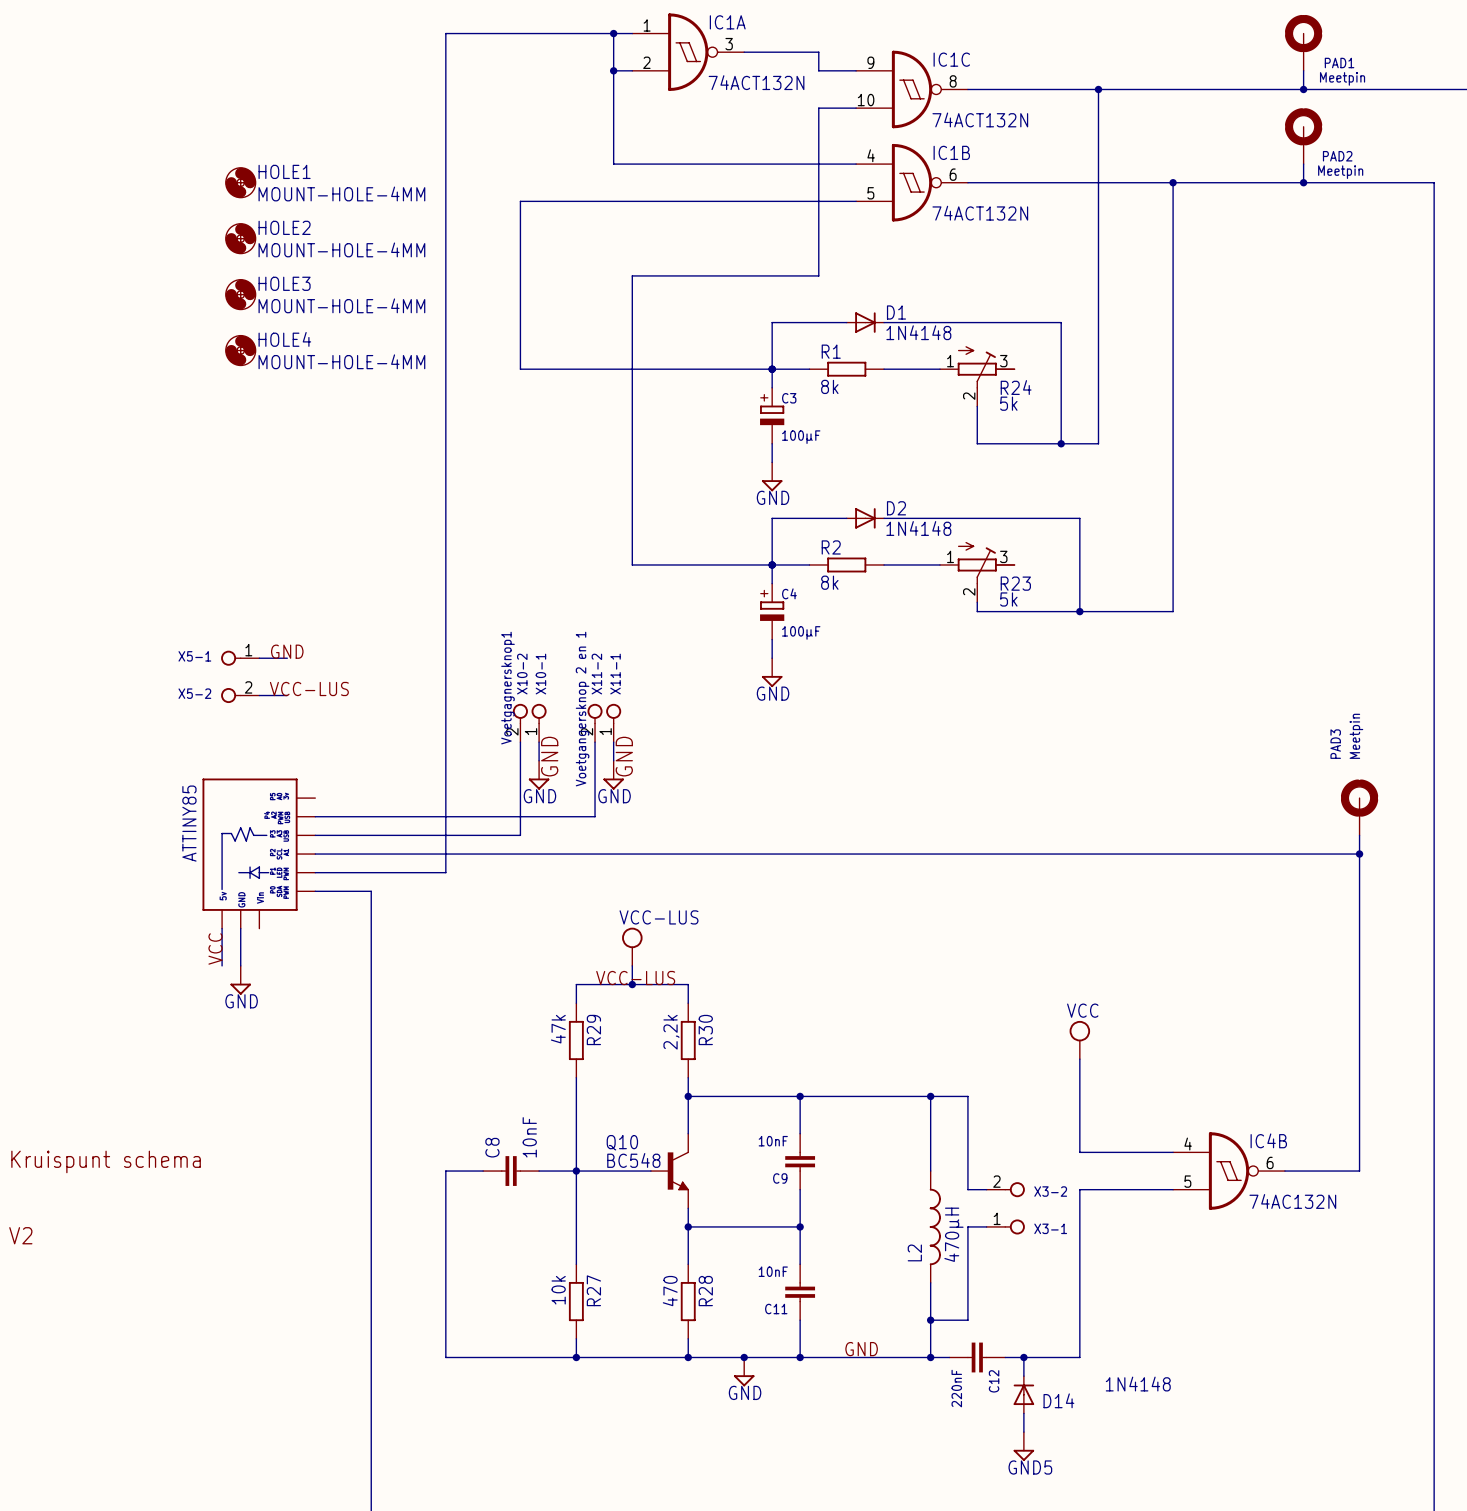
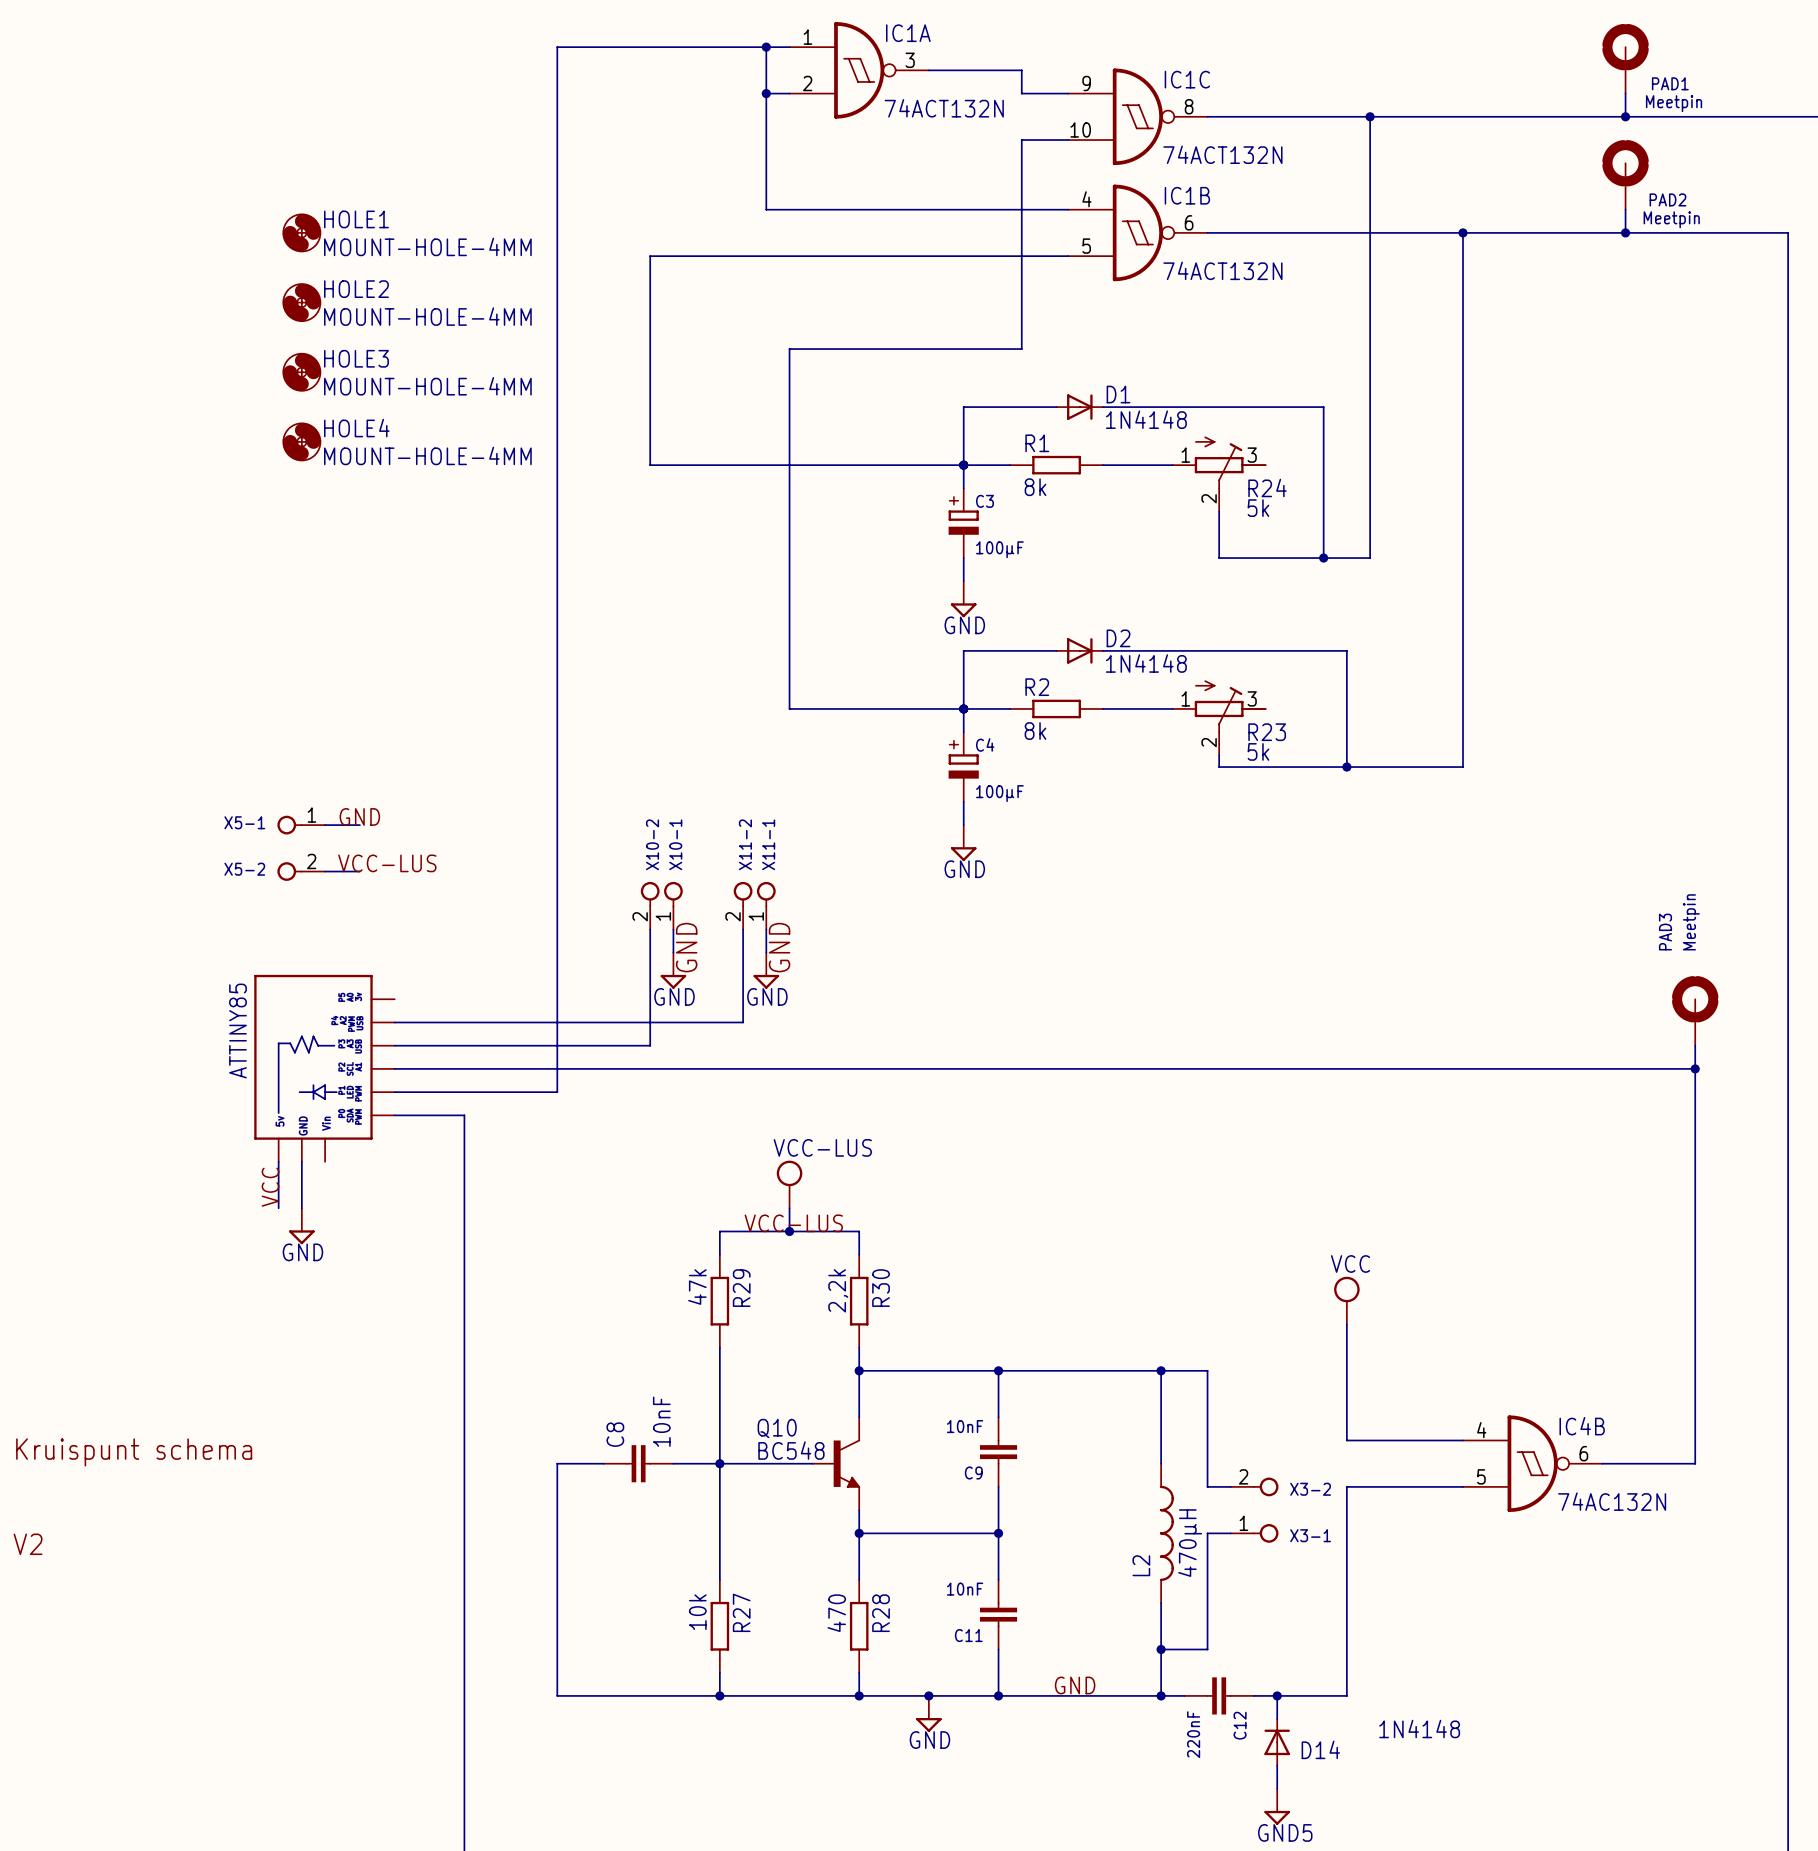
X10-2 value: Voetgagnersknop1 (507, 688) -> none
X11-2 value: Voetgangersknop 2 en 1 (582, 709) -> none

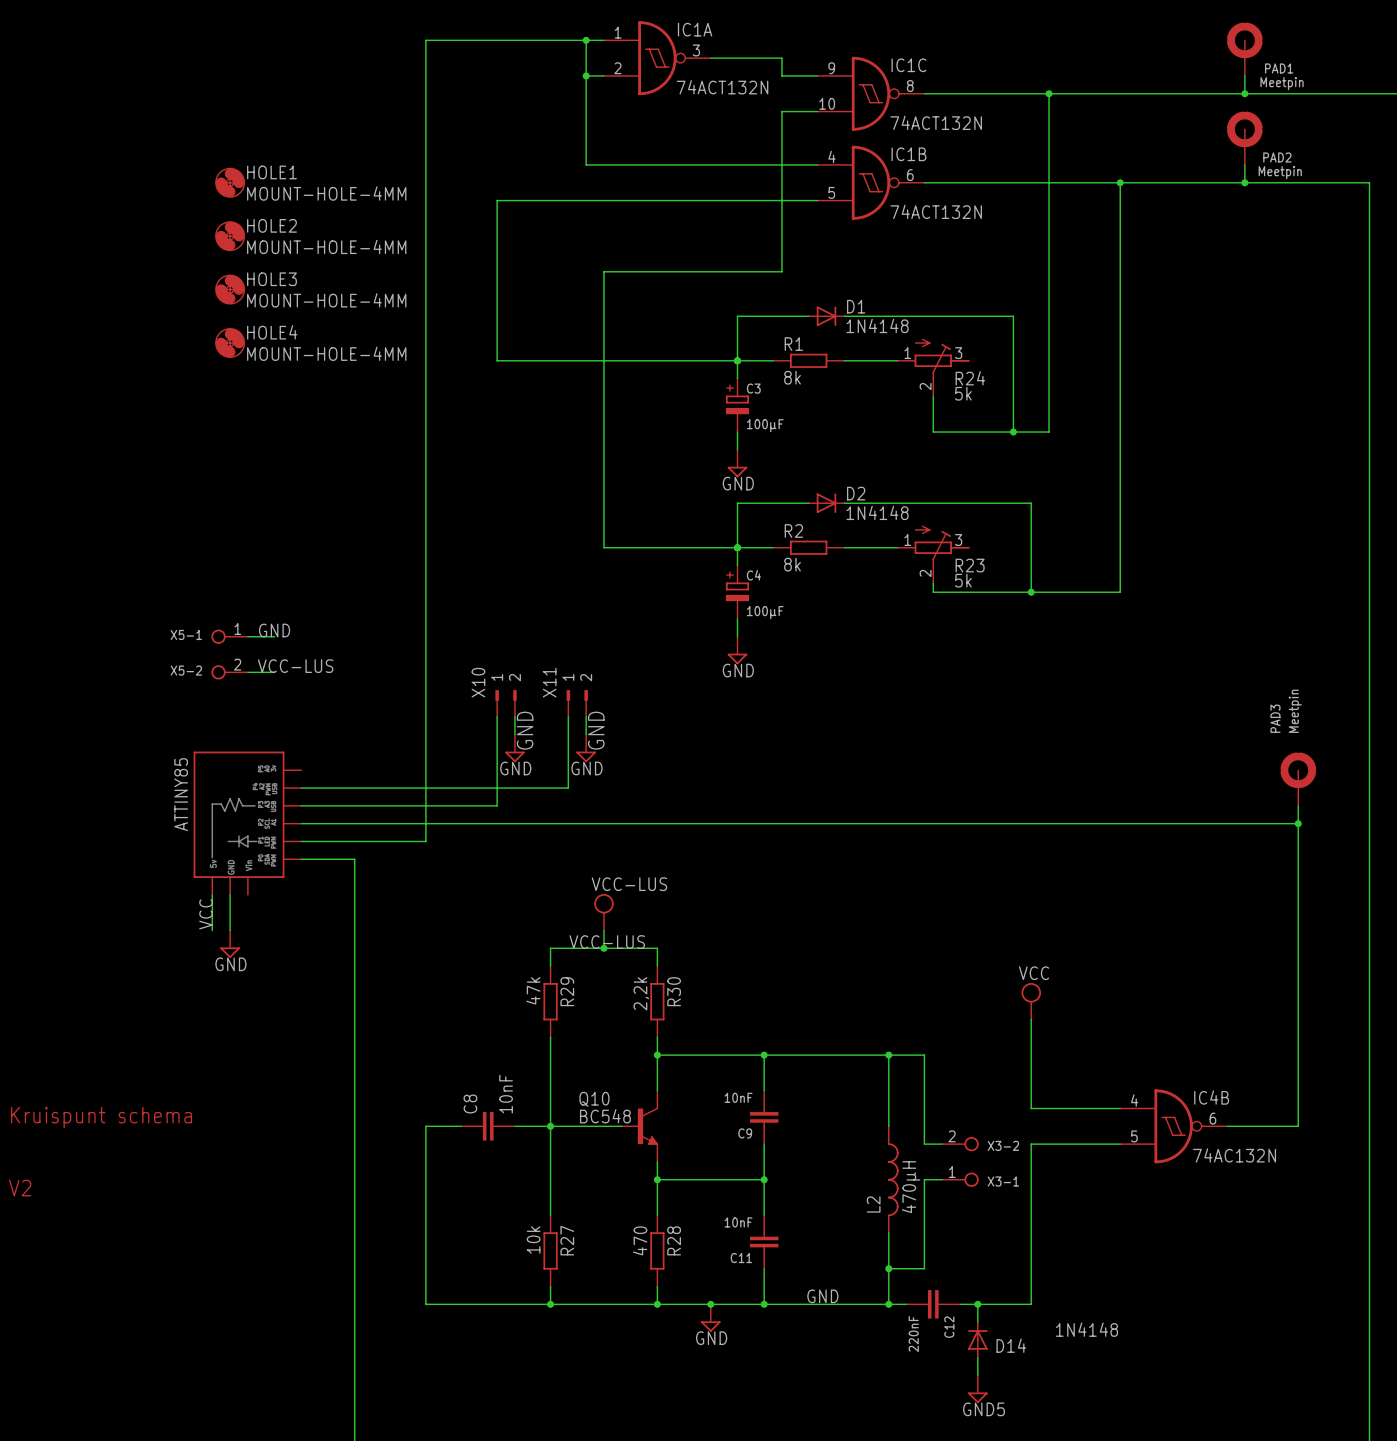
X10-2: (650, 905) -> none
X10-1: (673, 905) -> none
X11-2: (743, 905) -> none
X11-1: (766, 905) -> none
X10: none -> (506, 703)
X11: none -> (577, 703)

